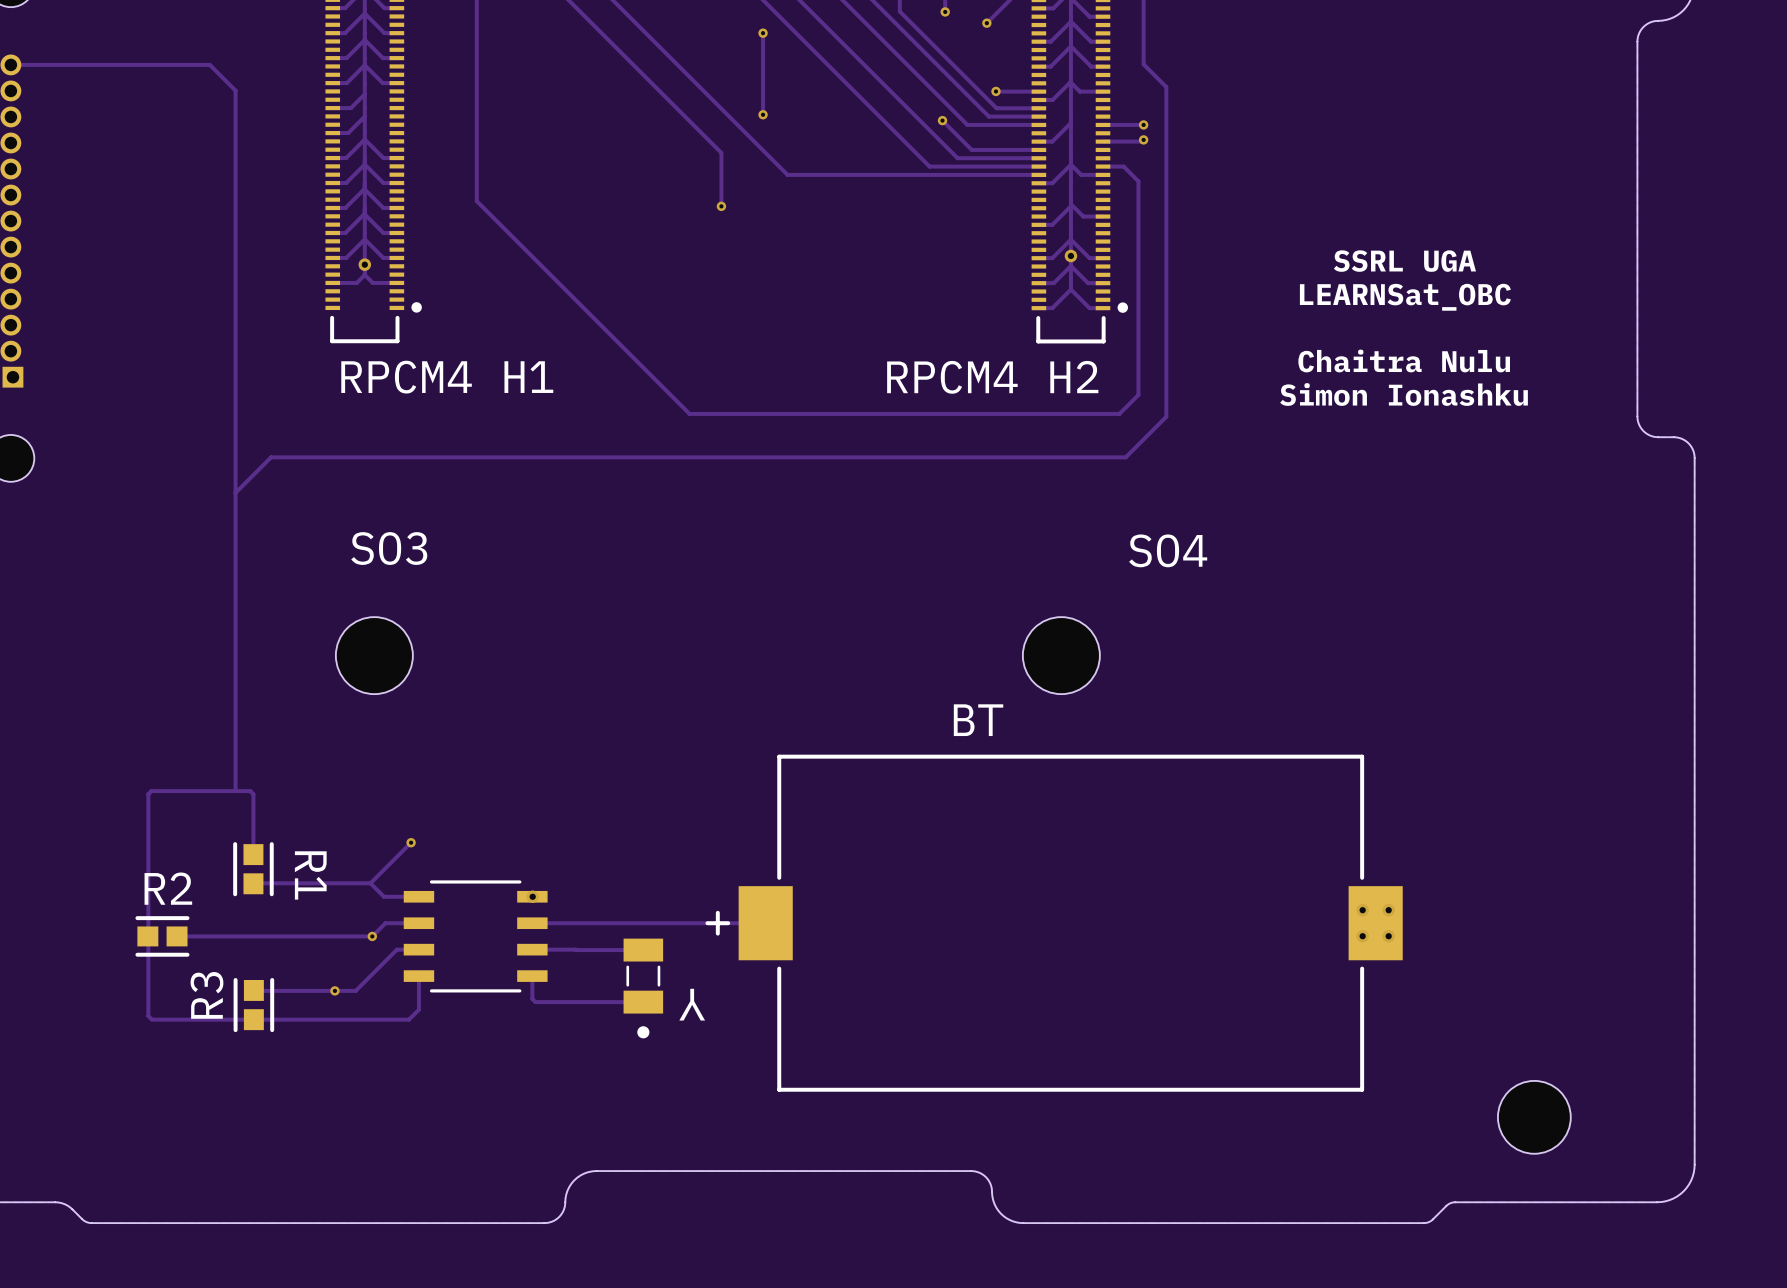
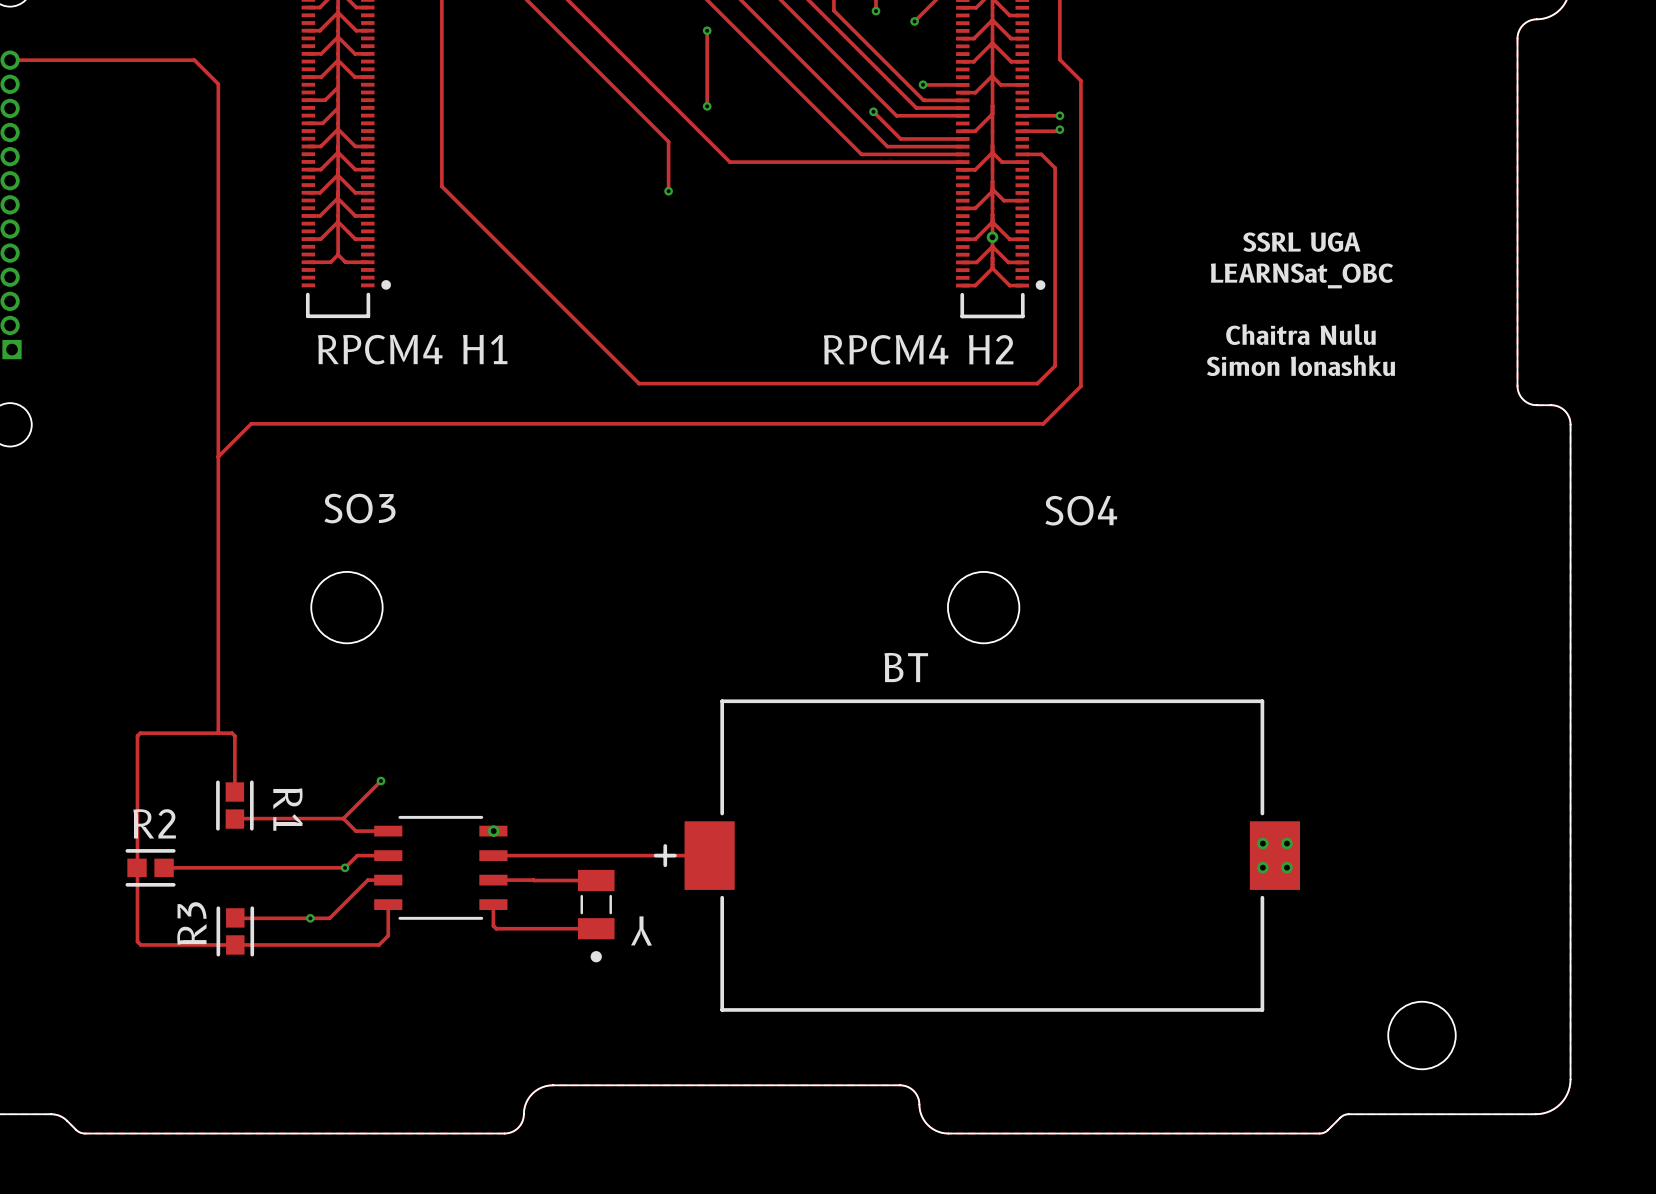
via: (364, 264) -> none

